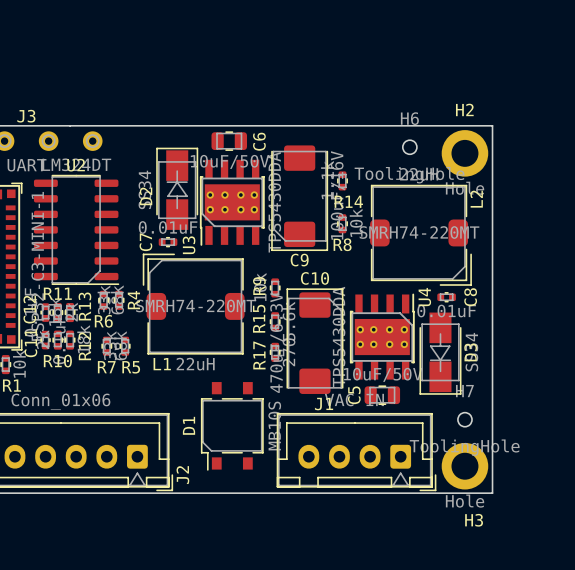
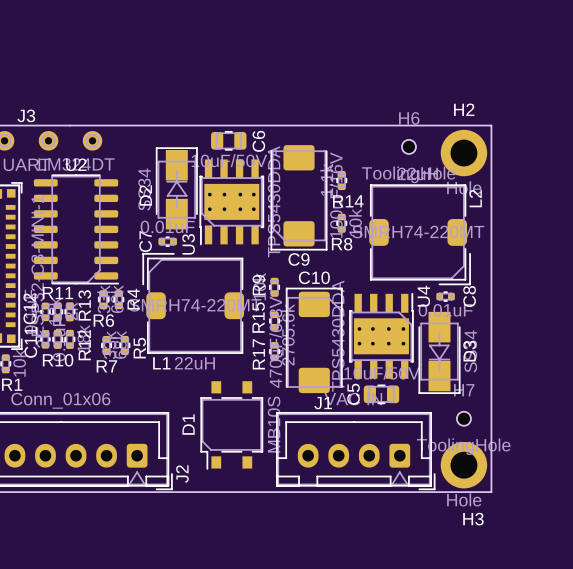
R5 name rotation: 0° (131, 367) -> 90° counterclockwise (139, 348)

